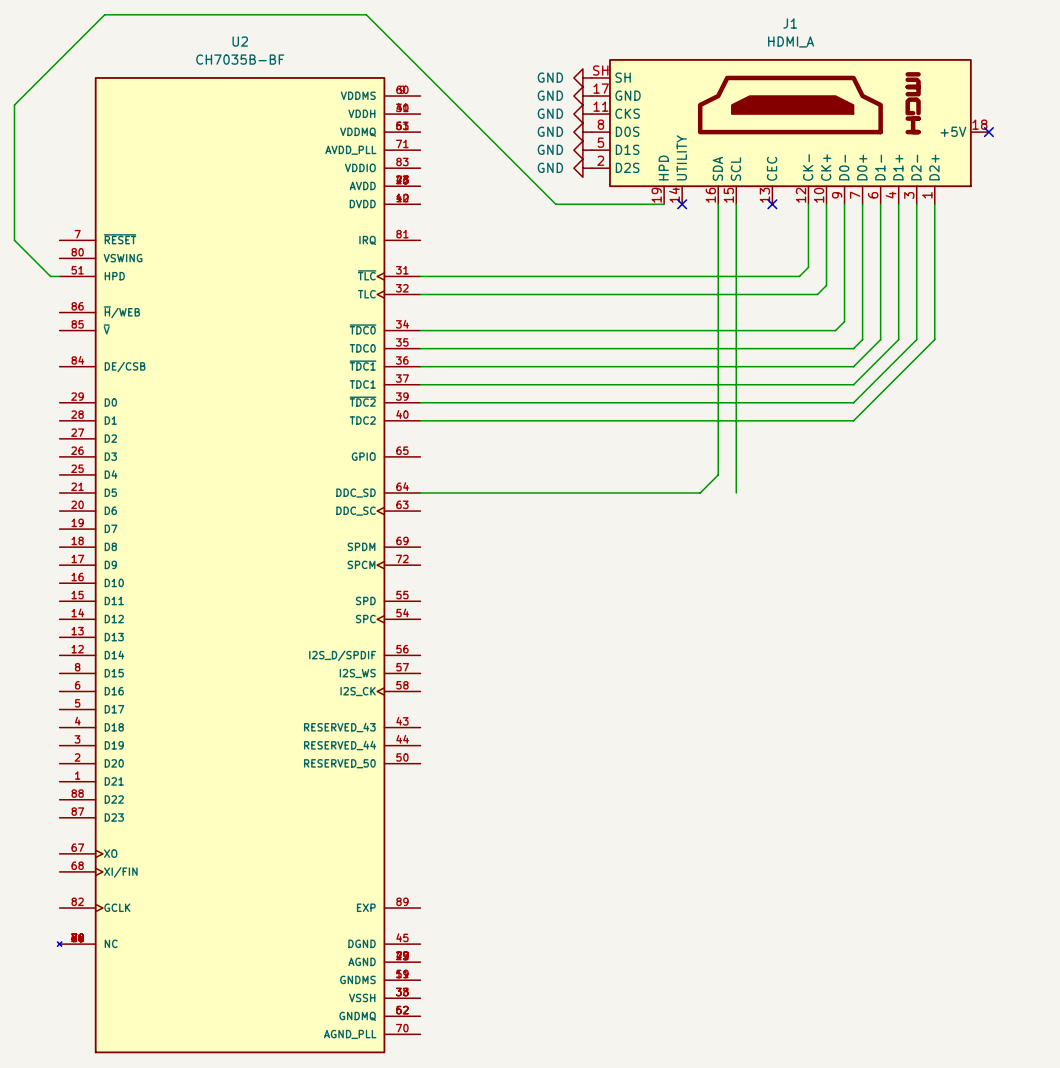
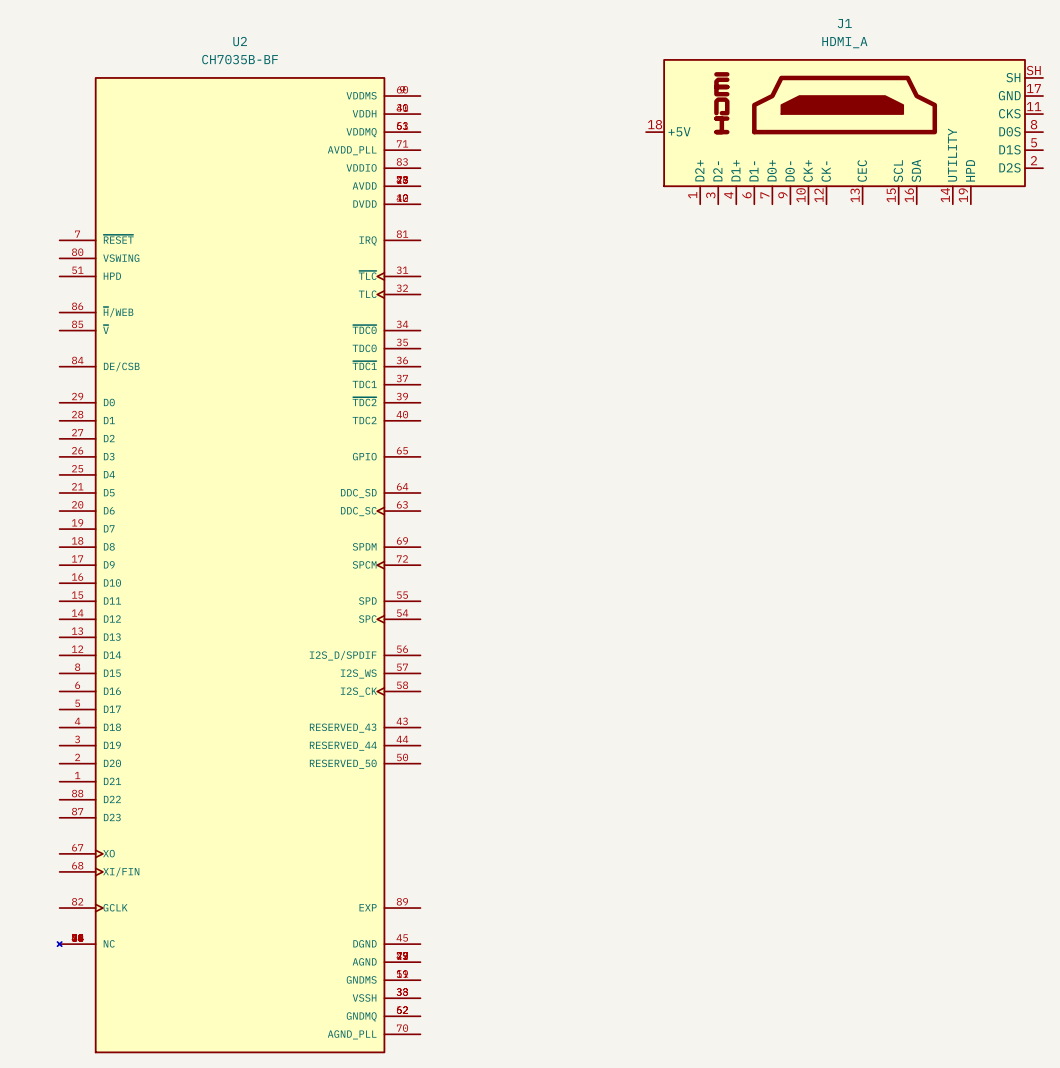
power symbol: GND (582, 77) -> none
power symbol: GND (582, 96) -> none
power symbol: GND (582, 114) -> none
J1 flip: as is (790, 123) -> left-right (844, 123)
power symbol: GND (582, 132) -> none
no-connect mark: (988, 132) -> none
power symbol: GND (582, 150) -> none
power symbol: GND (582, 168) -> none
wire: (664, 204) (555, 204) (366, 14) (104, 14) (14, 105) (14, 240) (50, 276) (59, 276) -> none
no-connect mark: (682, 204) -> none
wire: (718, 204) (718, 474) (700, 492) (420, 492) -> none
wire: (736, 204) (736, 492) -> none
no-connect mark: (772, 204) -> none
wire: (808, 204) (808, 267) (799, 276) (420, 276) -> none
wire: (826, 204) (826, 285) (817, 294) (420, 294) -> none
wire: (844, 204) (844, 321) (835, 330) (420, 330) -> none
wire: (862, 204) (862, 339) (853, 348) (420, 348) -> none
wire: (880, 204) (880, 339) (853, 366) (420, 366) -> none
wire: (898, 204) (898, 339) (853, 384) (420, 384) -> none
wire: (916, 204) (916, 339) (853, 402) (420, 402) -> none
wire: (934, 204) (934, 339) (853, 420) (420, 420) -> none

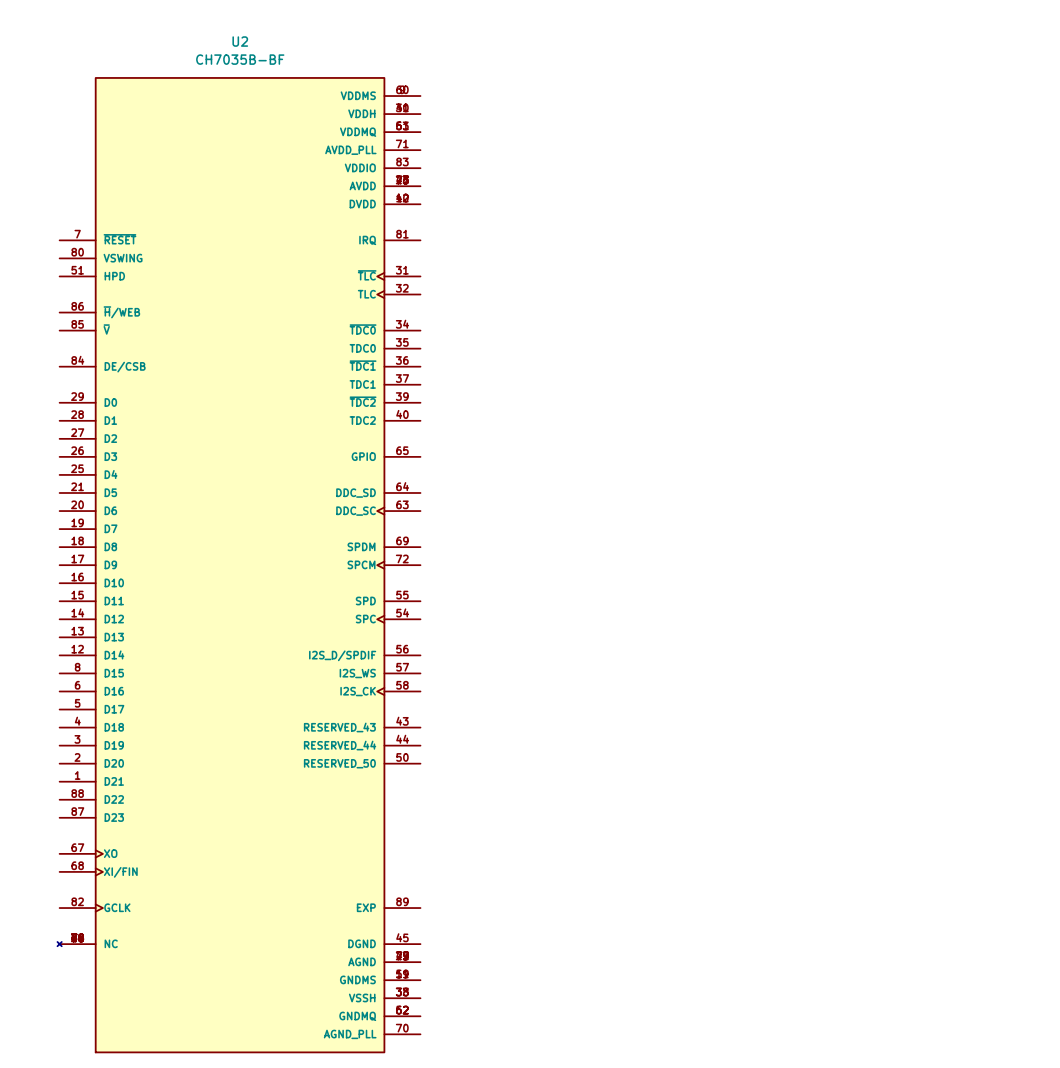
J1: HDMI_A (844, 131) -> none

